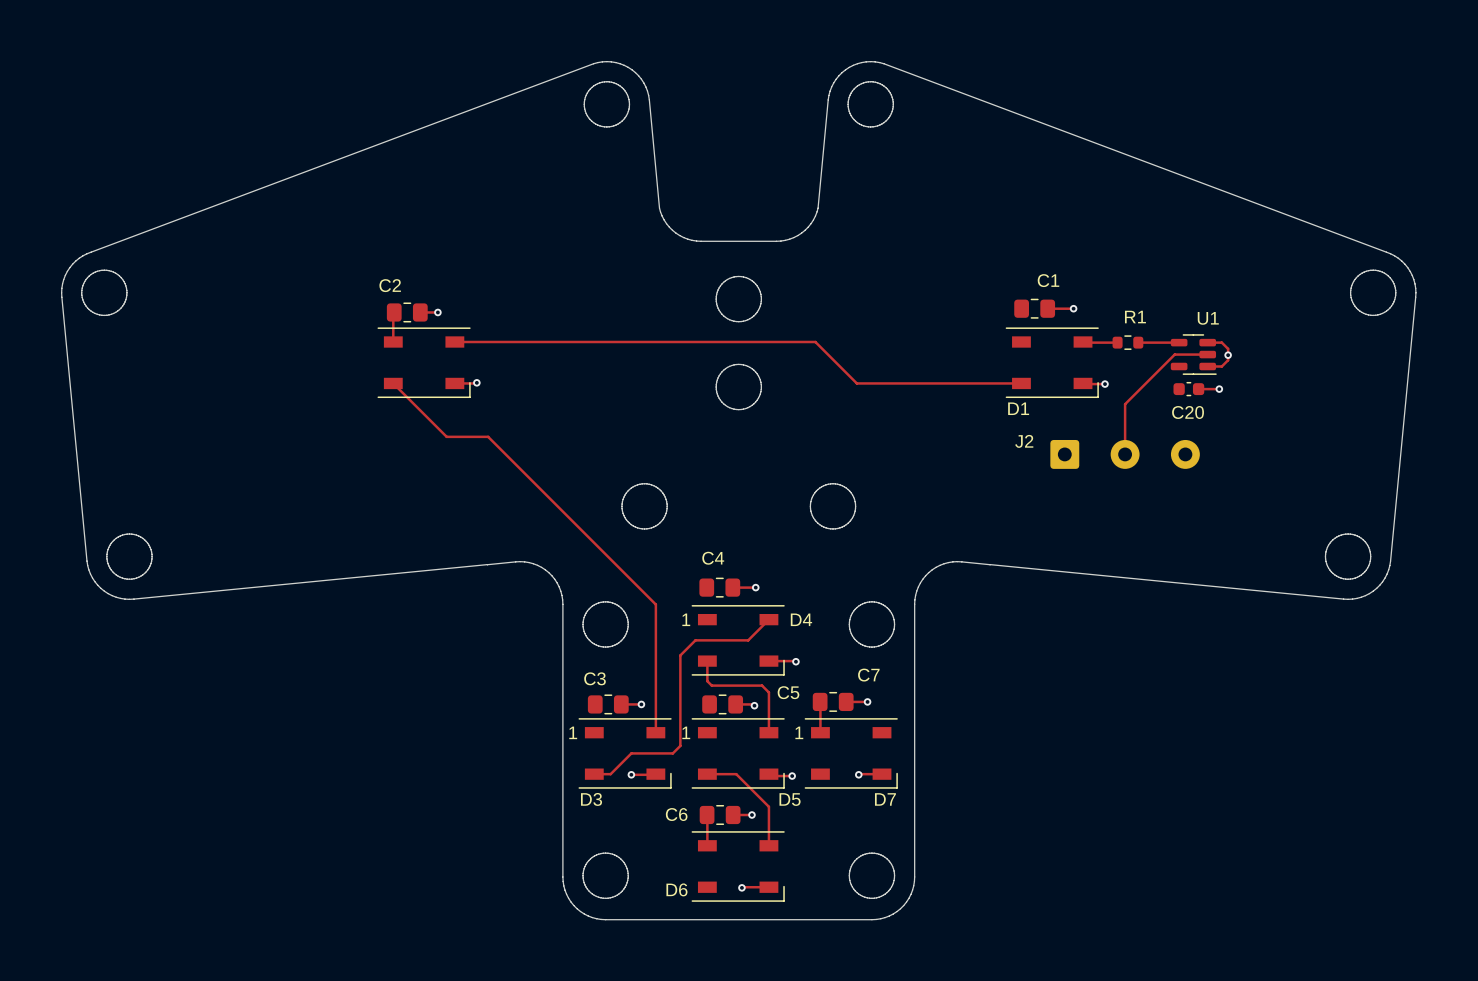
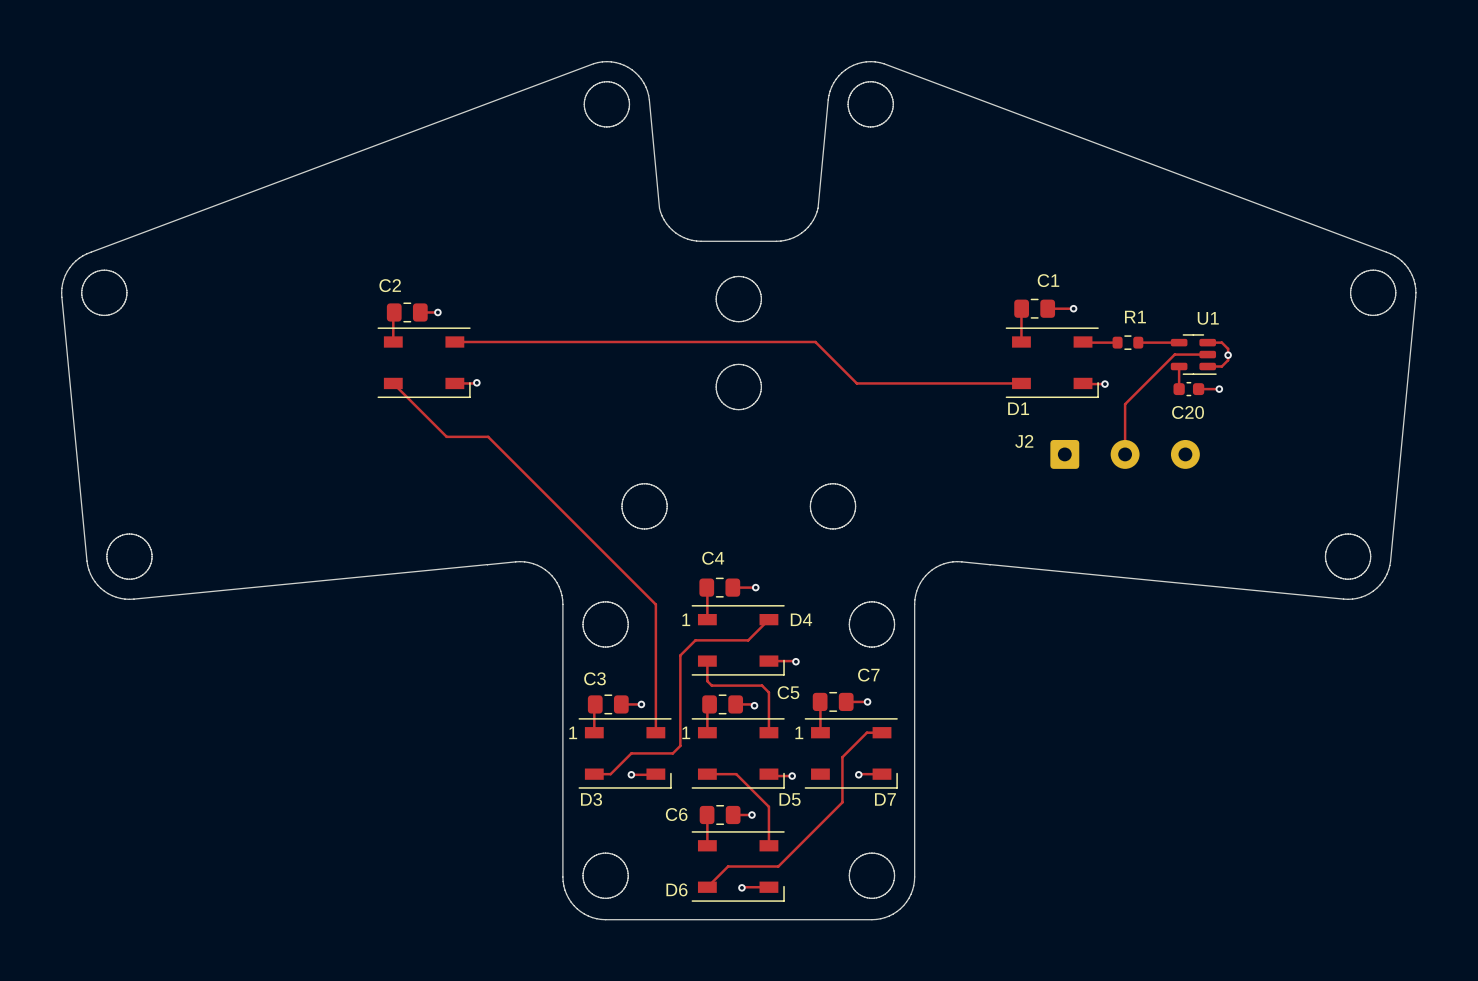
track: none -> (1021, 308) (1021, 342)
track: none -> (1179, 366) (1179, 389)
track: none -> (706, 587) (707, 619)
track: none -> (595, 704) (594, 732)
track: none -> (709, 704) (707, 706) (707, 732)
track: none -> (882, 732) (866, 732) (842, 757) (842, 802) (778, 866) (728, 866) (707, 887)

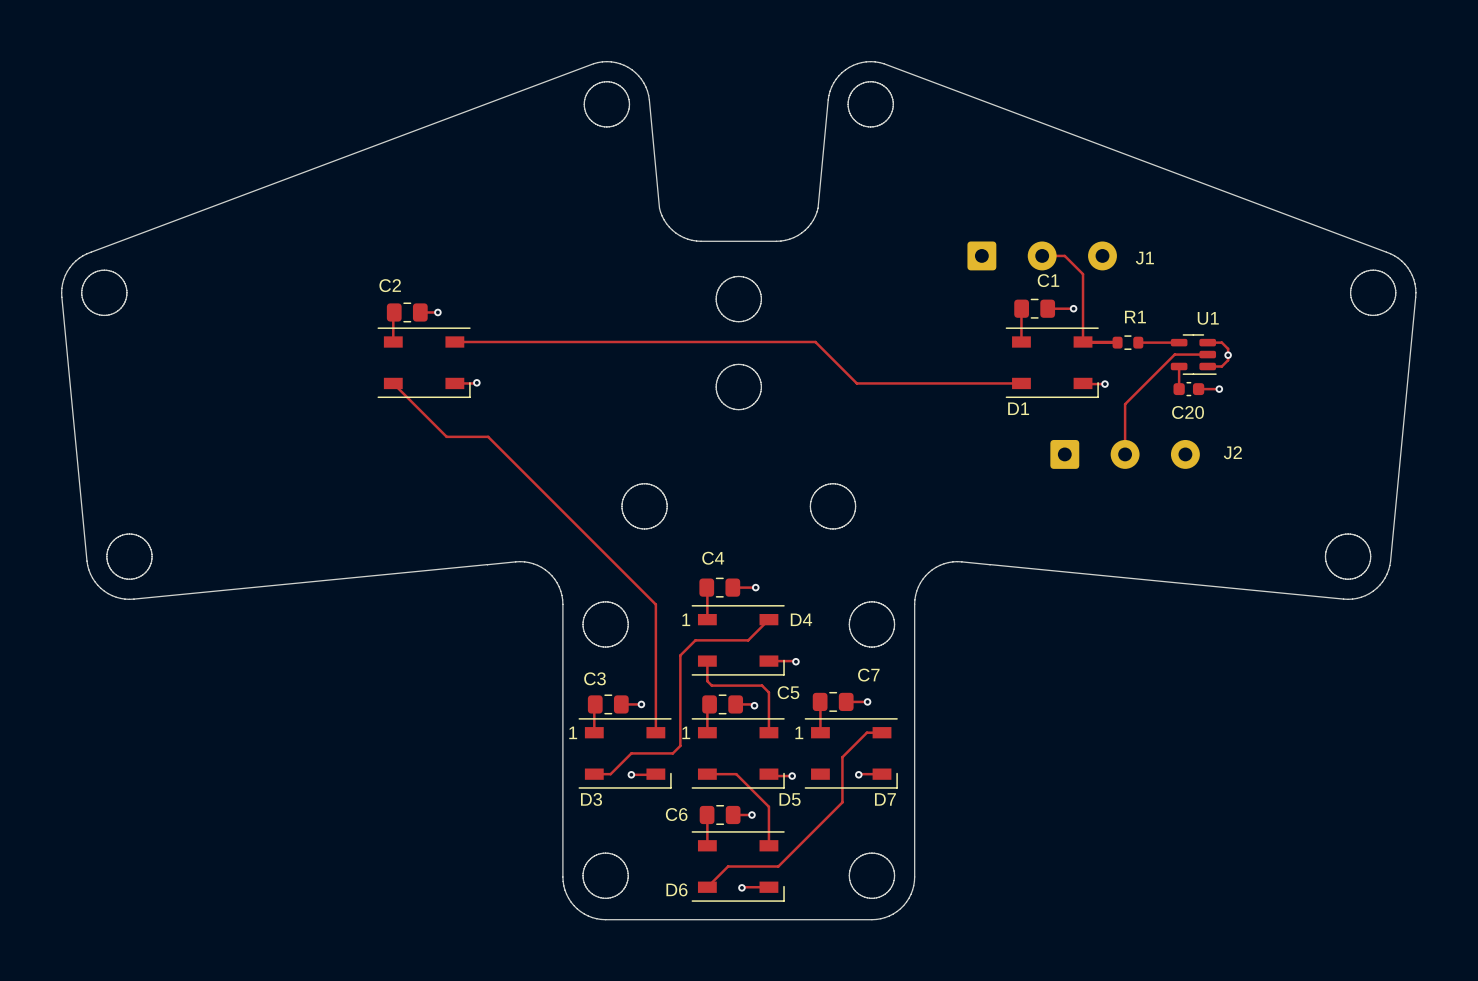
track: none -> (1042, 255) (1064, 255) (1083, 274) (1083, 342) (1117, 342)
J1: none -> (1042, 255)
J2 name position: J2 (1024, 441) -> J2 (1232, 452)

